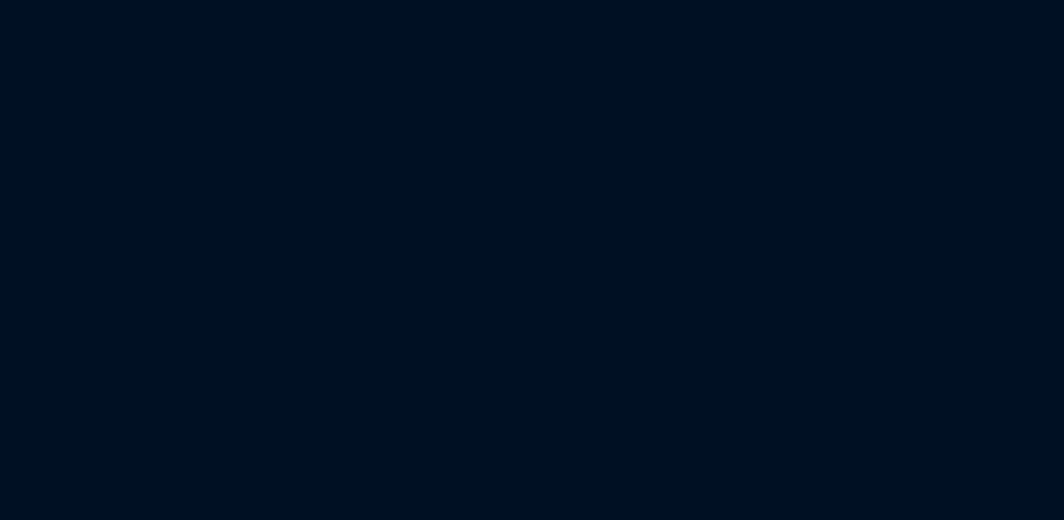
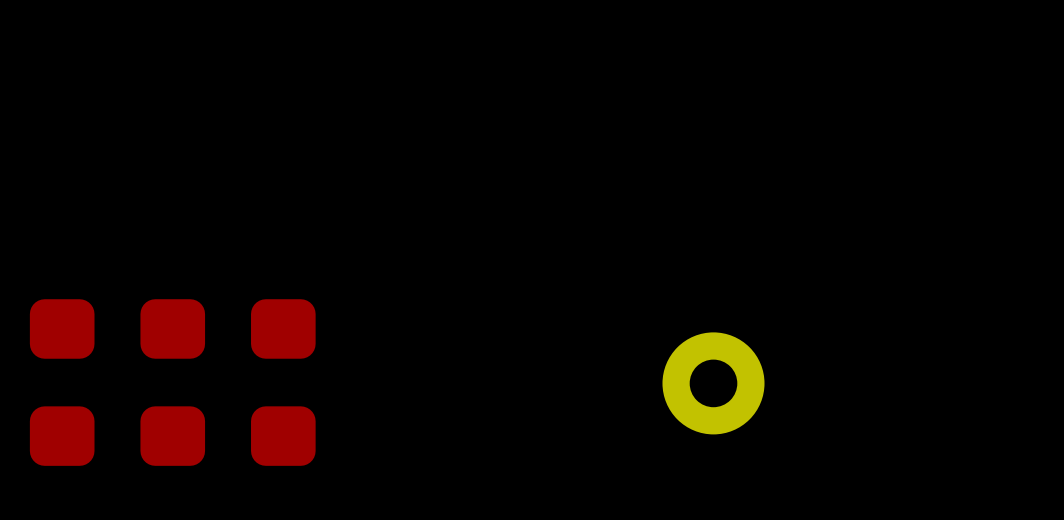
part: none -> (62, 382)
part: none -> (172, 382)
part: none -> (283, 382)
part: none -> (713, 383)

